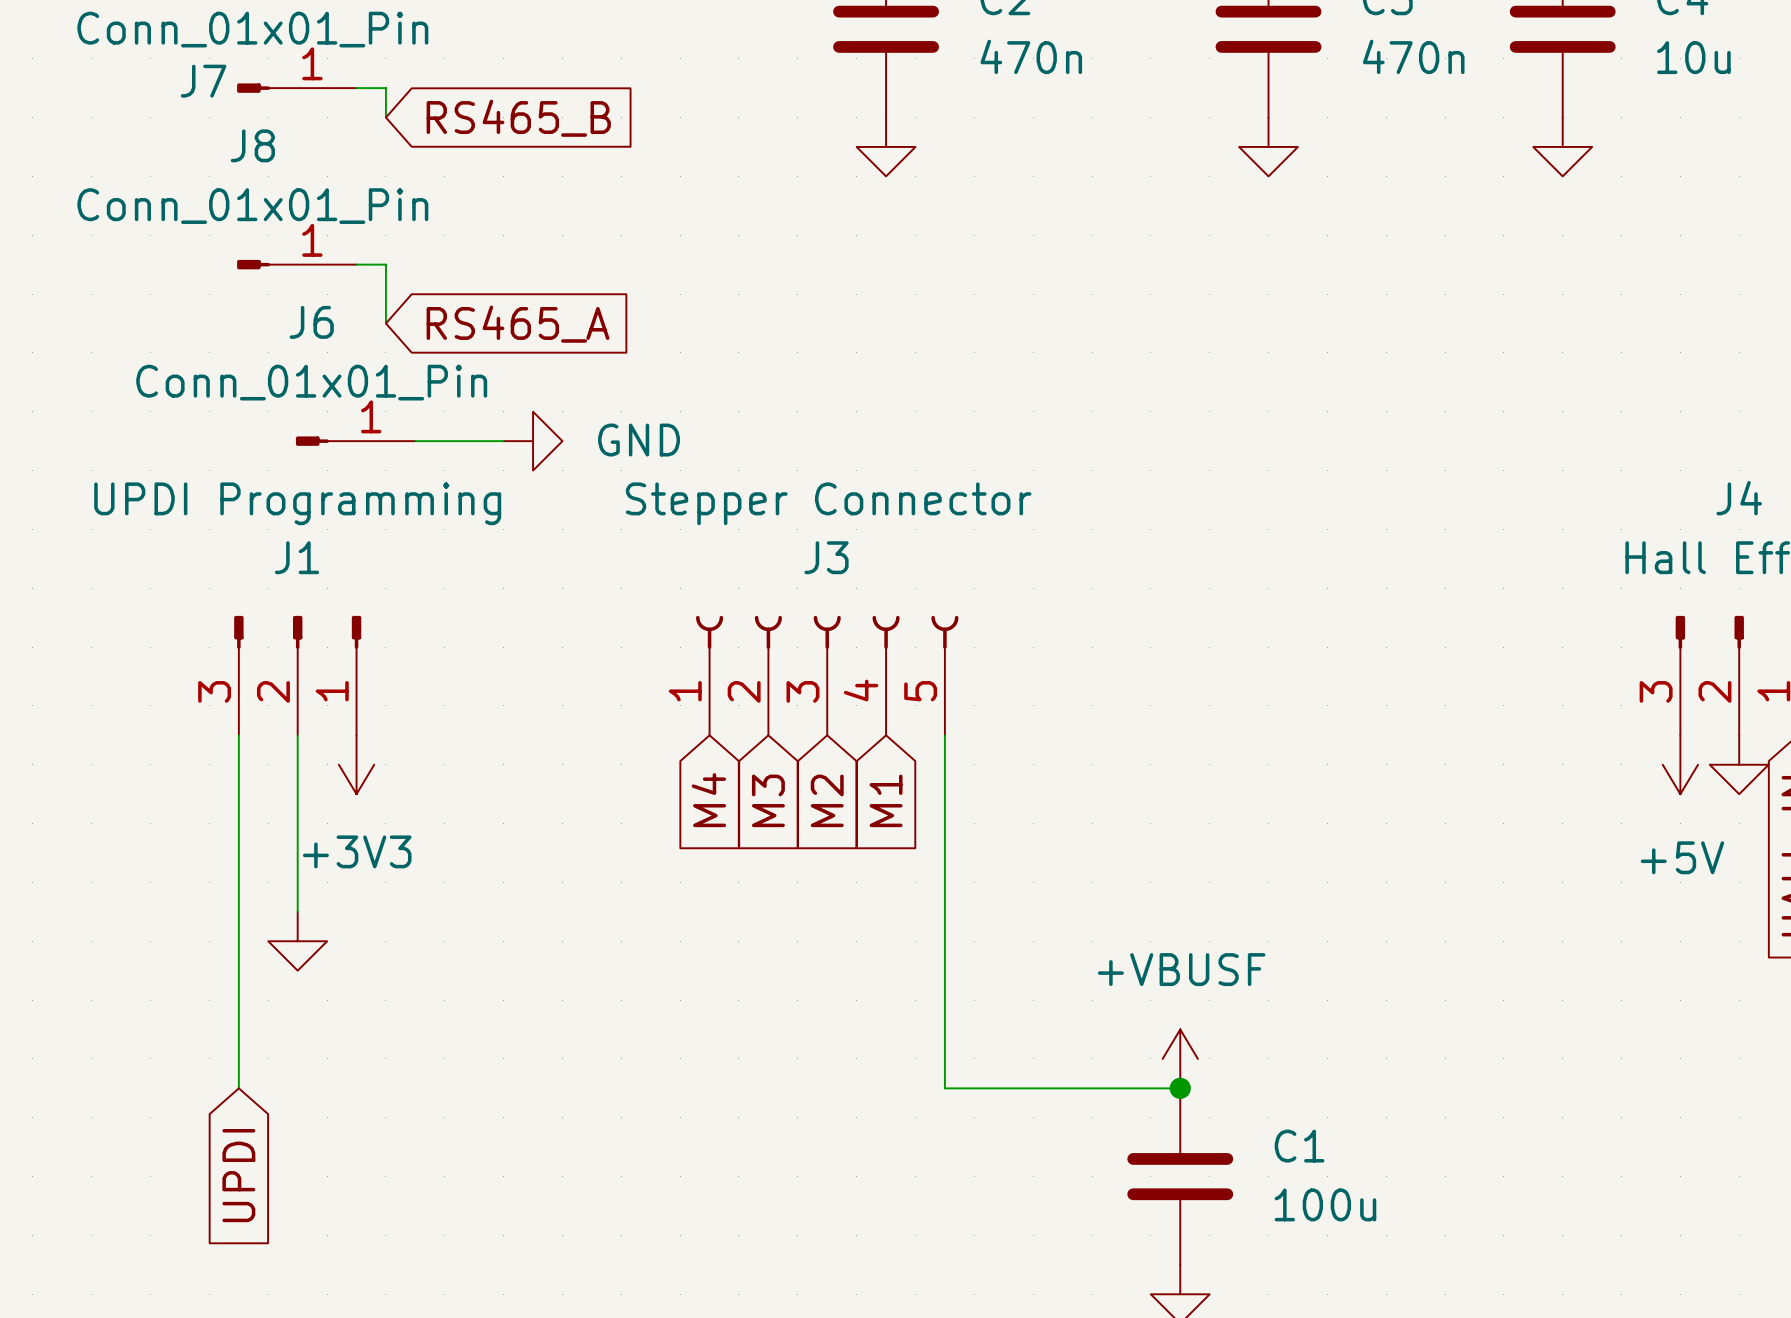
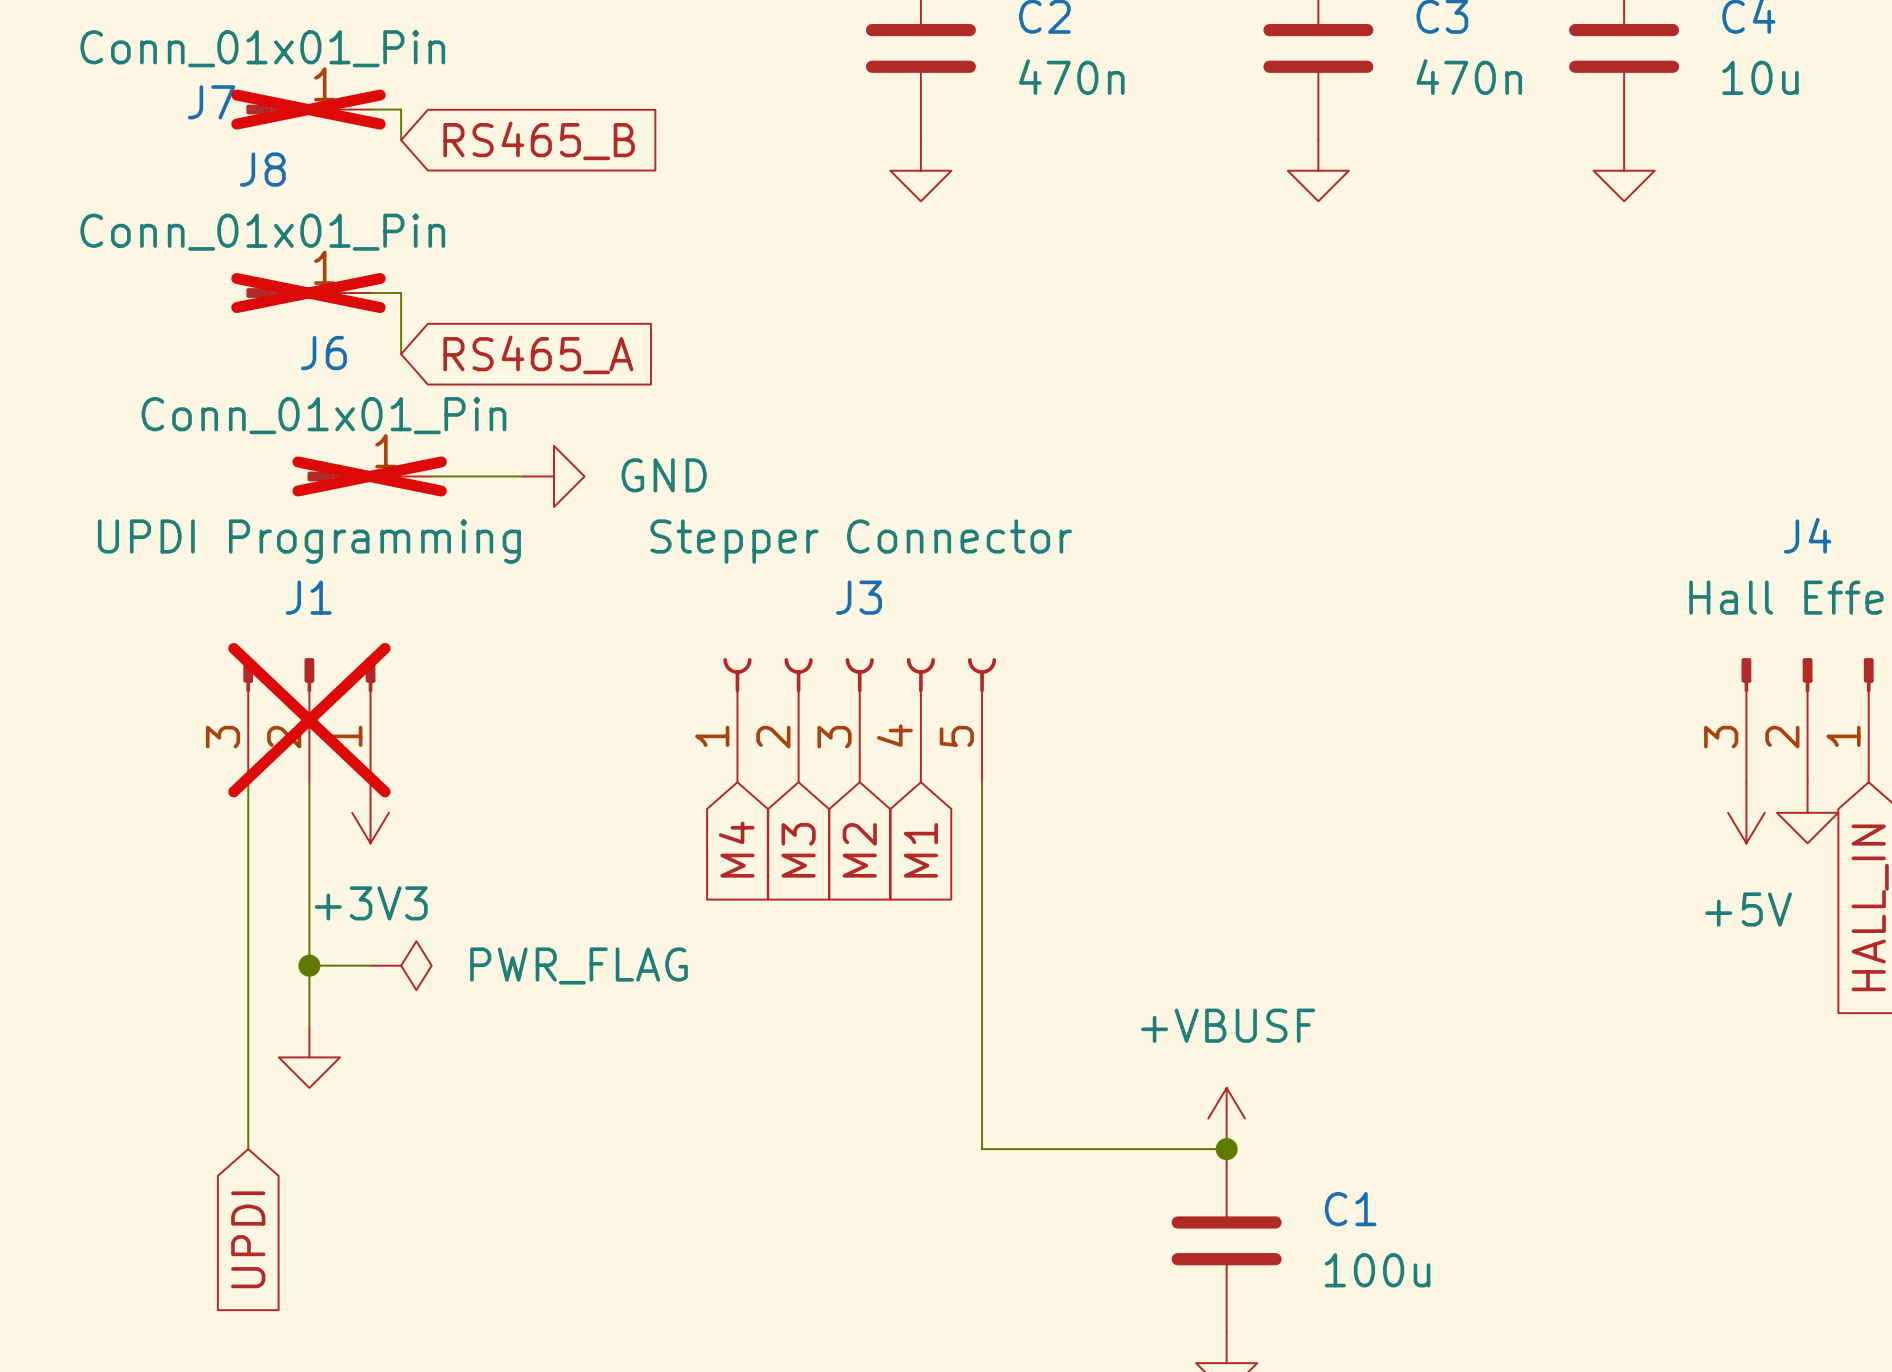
J7 do-not-place cross: none -> (308, 109)
J8 do-not-place cross: none -> (308, 293)
J6 do-not-place cross: none -> (369, 476)
J1 do-not-place cross: none -> (309, 720)
junction: none -> (309, 965)
wire: none -> (370, 965) (309, 965) (309, 1026)
power symbol: none -> PWR_FLAG (401, 965)
power symbol position: (297, 941) -> (309, 1057)

